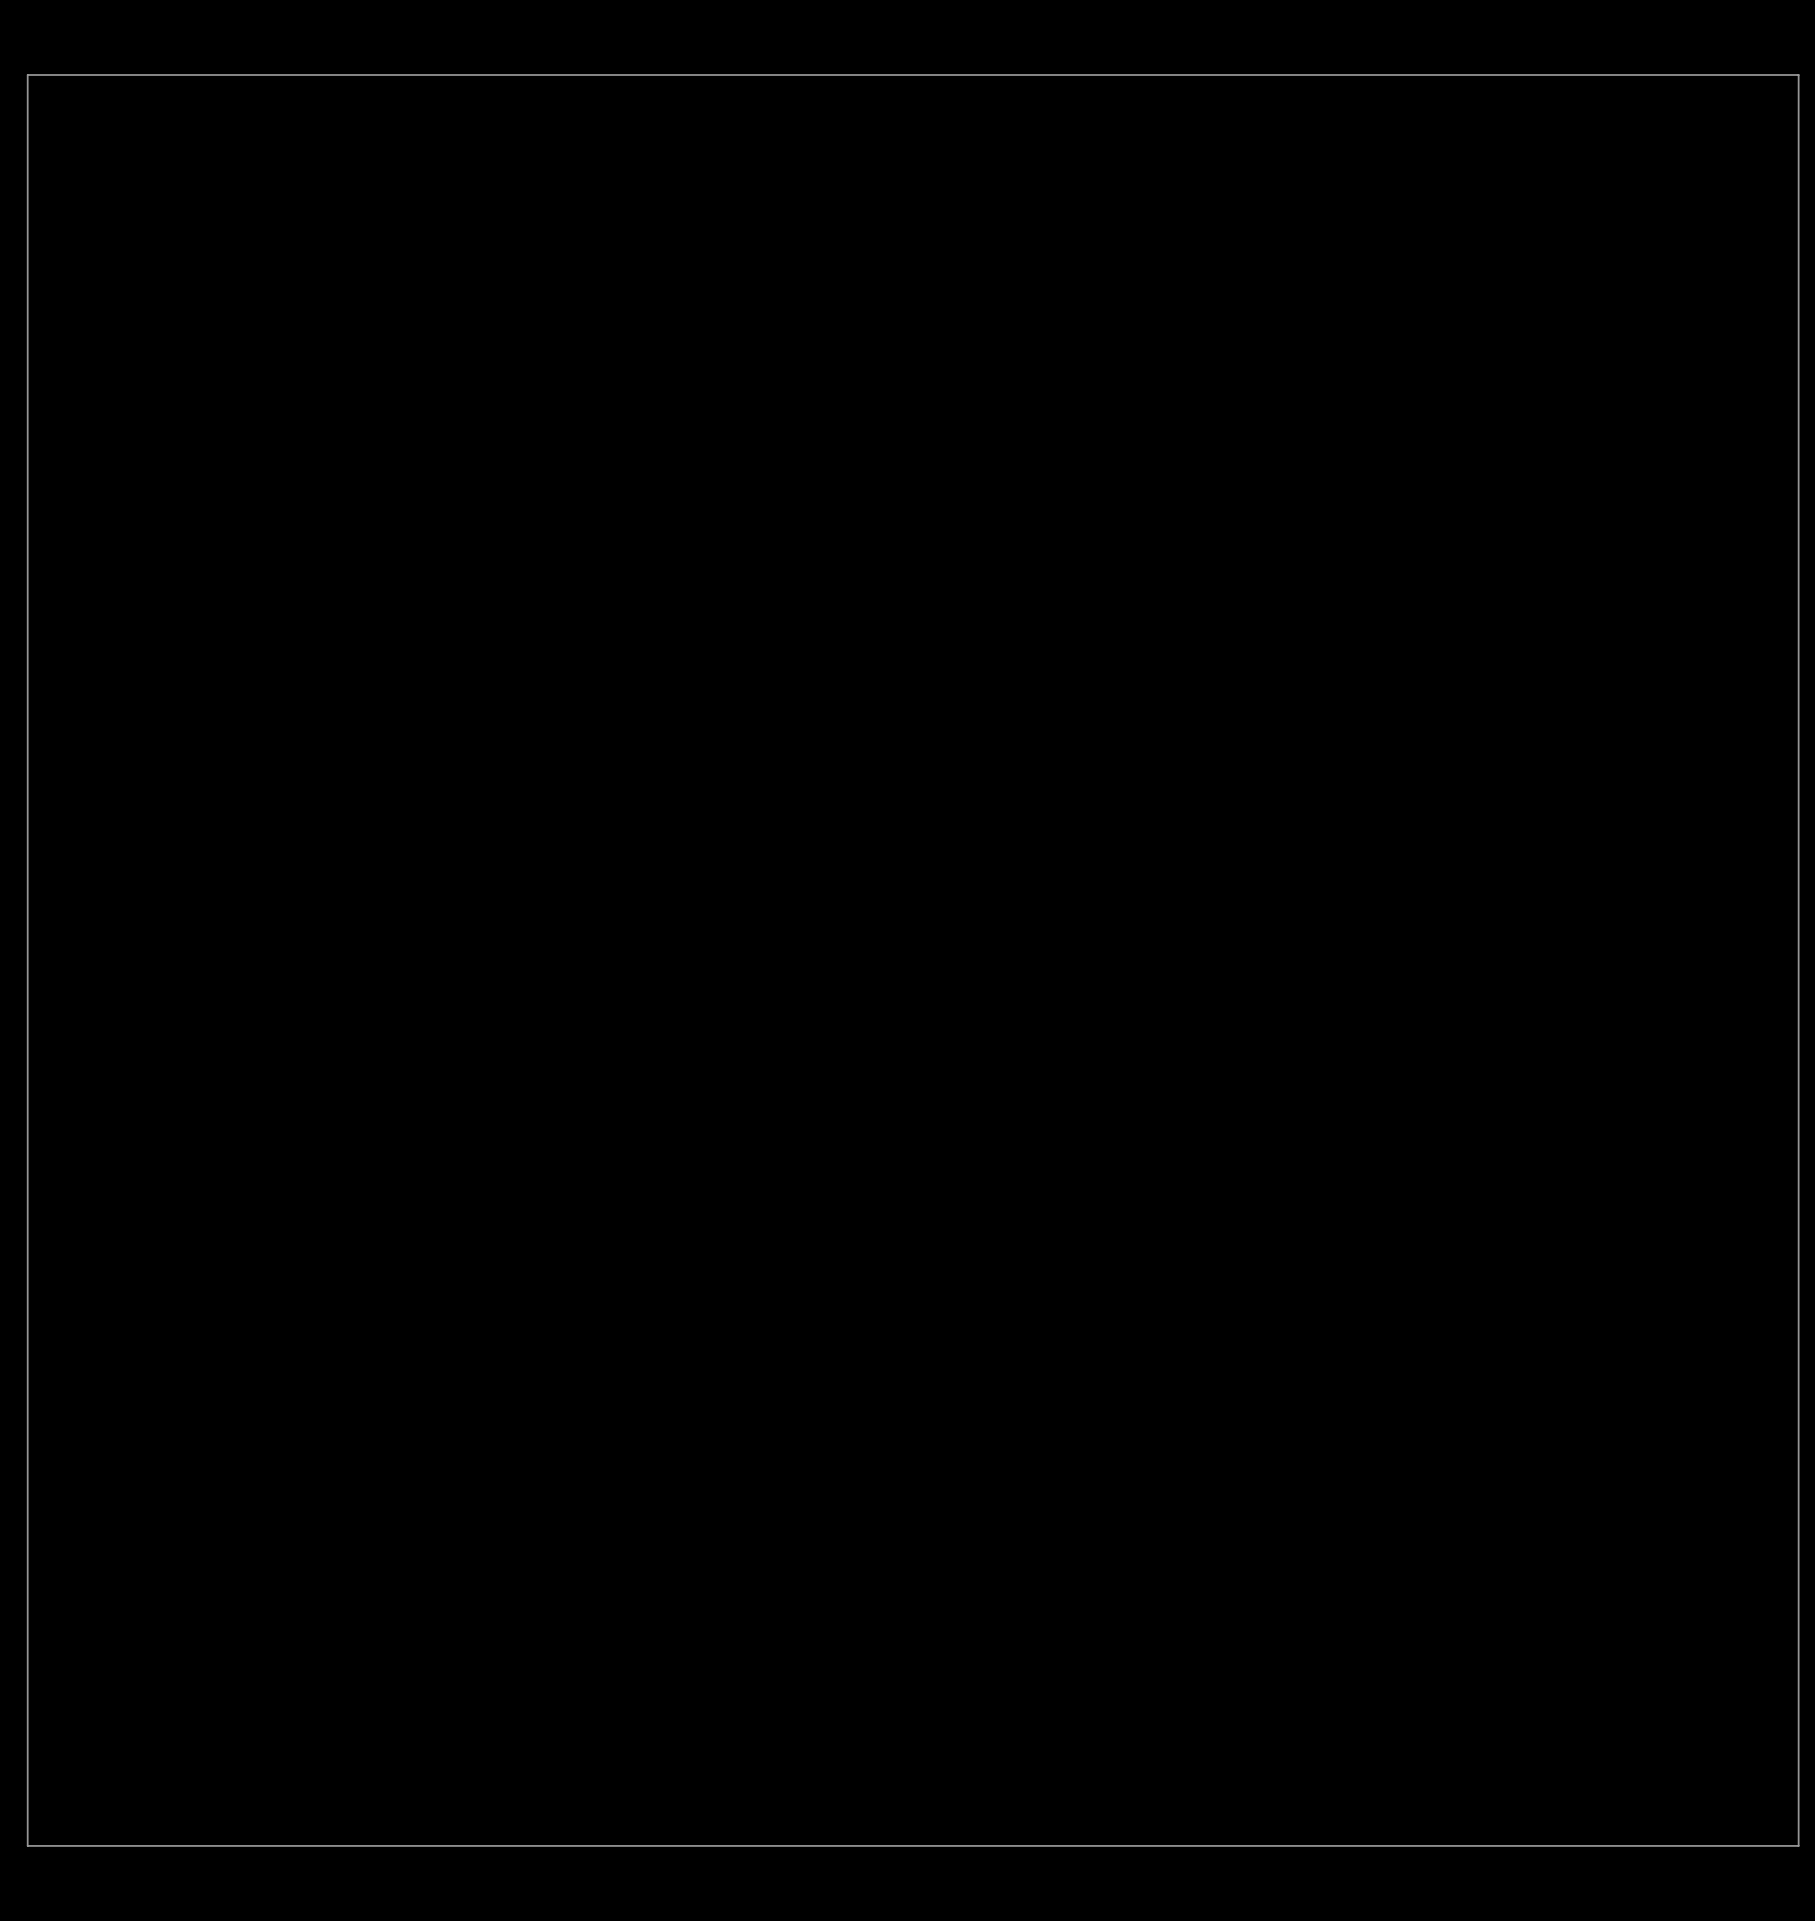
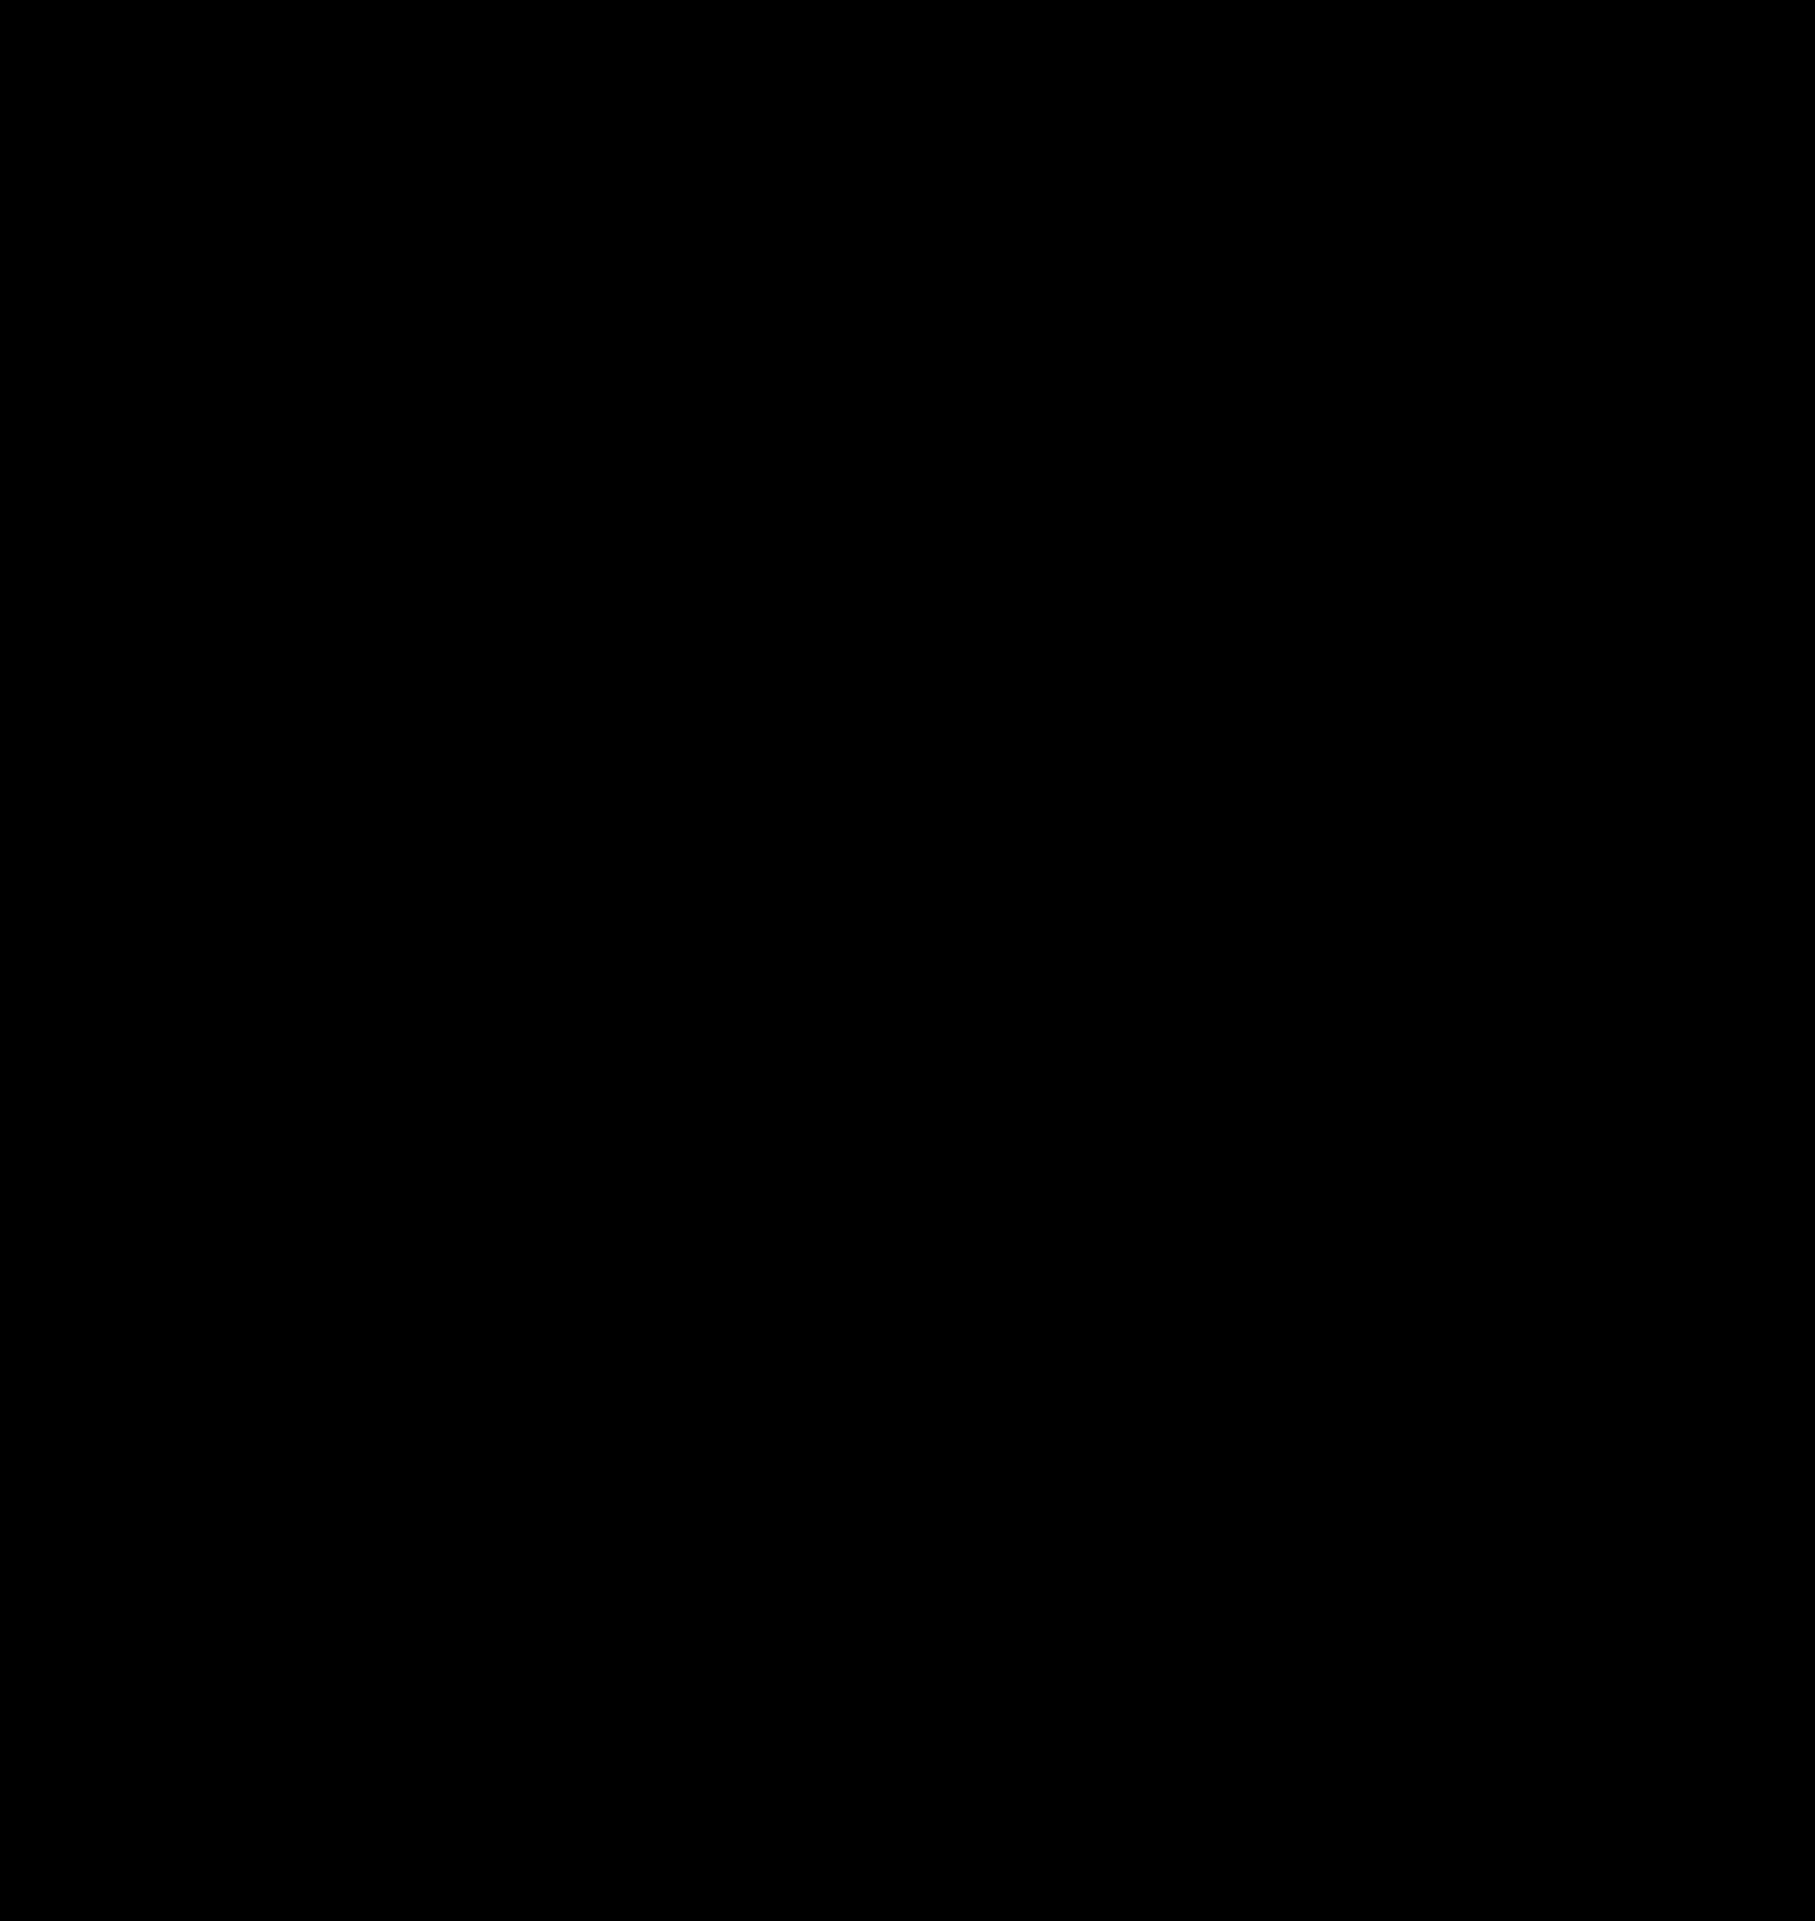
line: (27, 74) (1798, 74) (1798, 1845) (27, 1845) (27, 74) -> none

